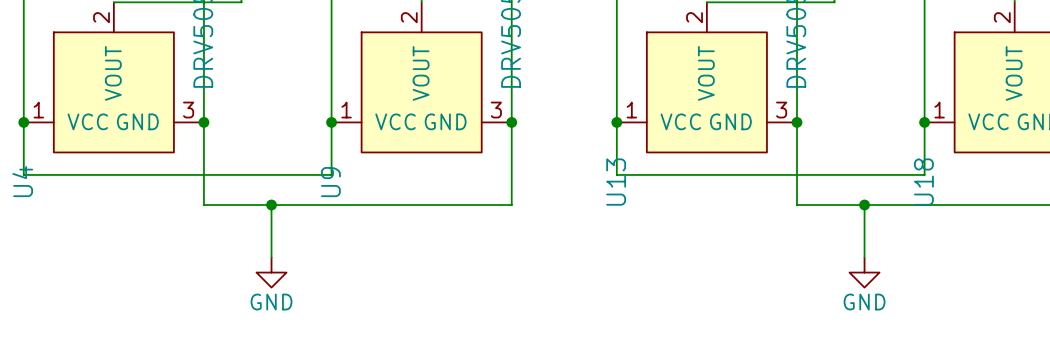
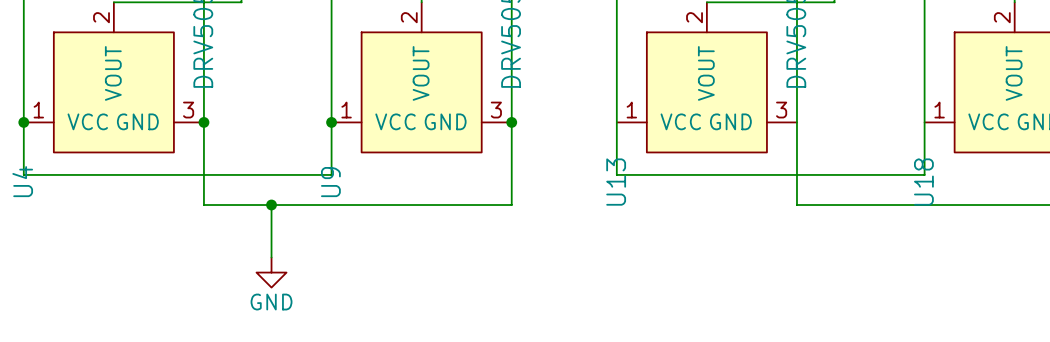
junction: (616, 122) -> none
junction: (796, 122) -> none
junction: (924, 122) -> none
wire: (864, 205) (864, 257) -> none
junction: (864, 205) -> none
power symbol: GND (864, 272) -> none

